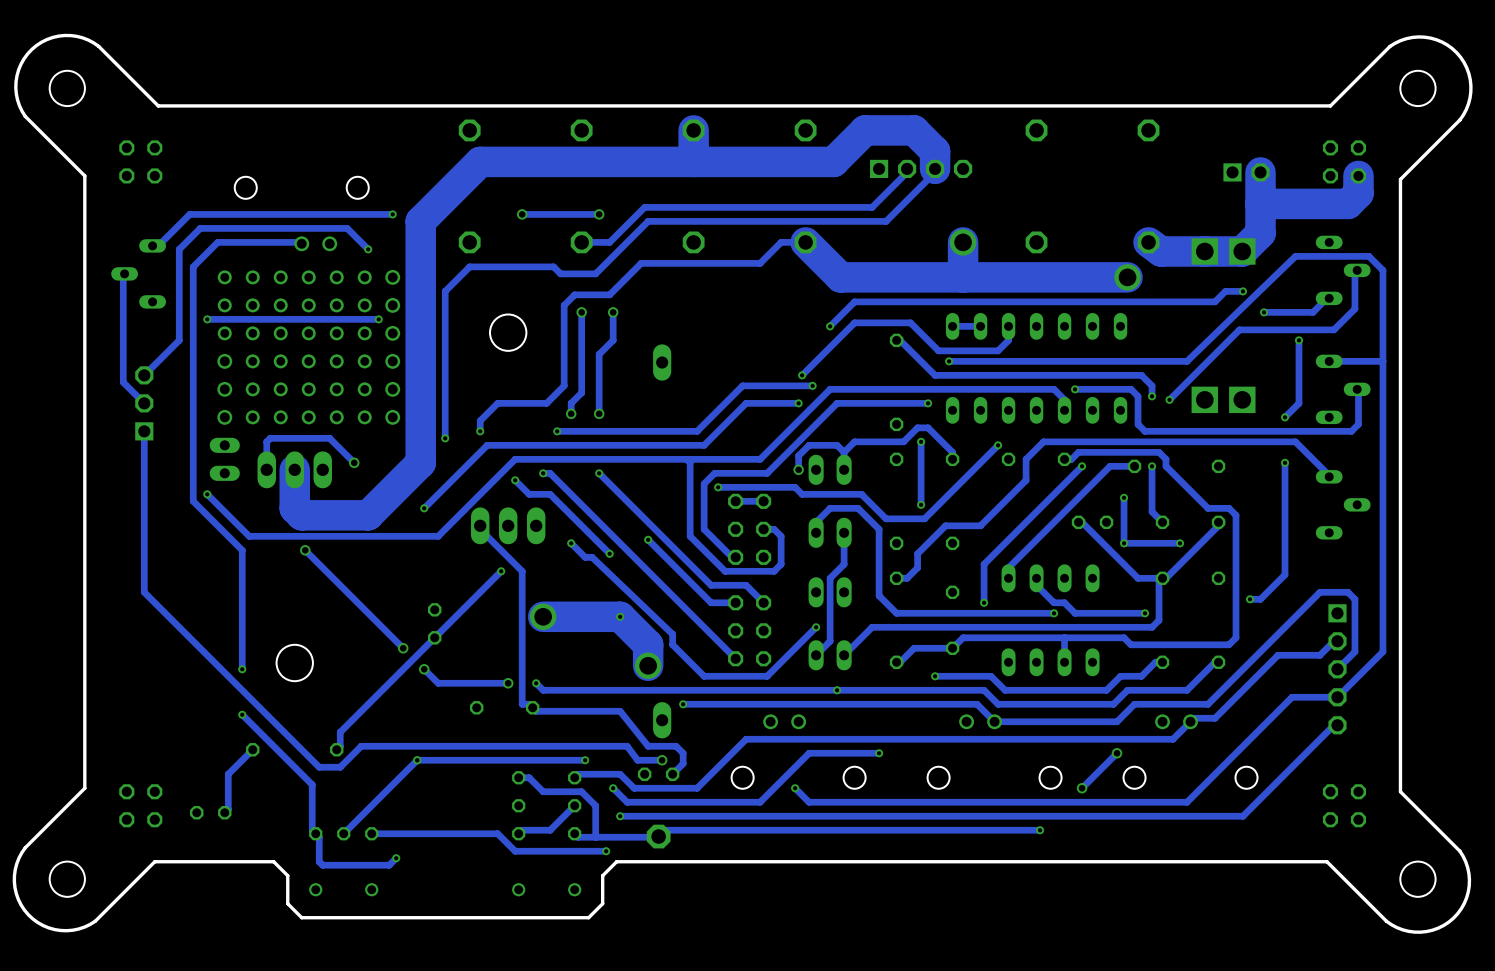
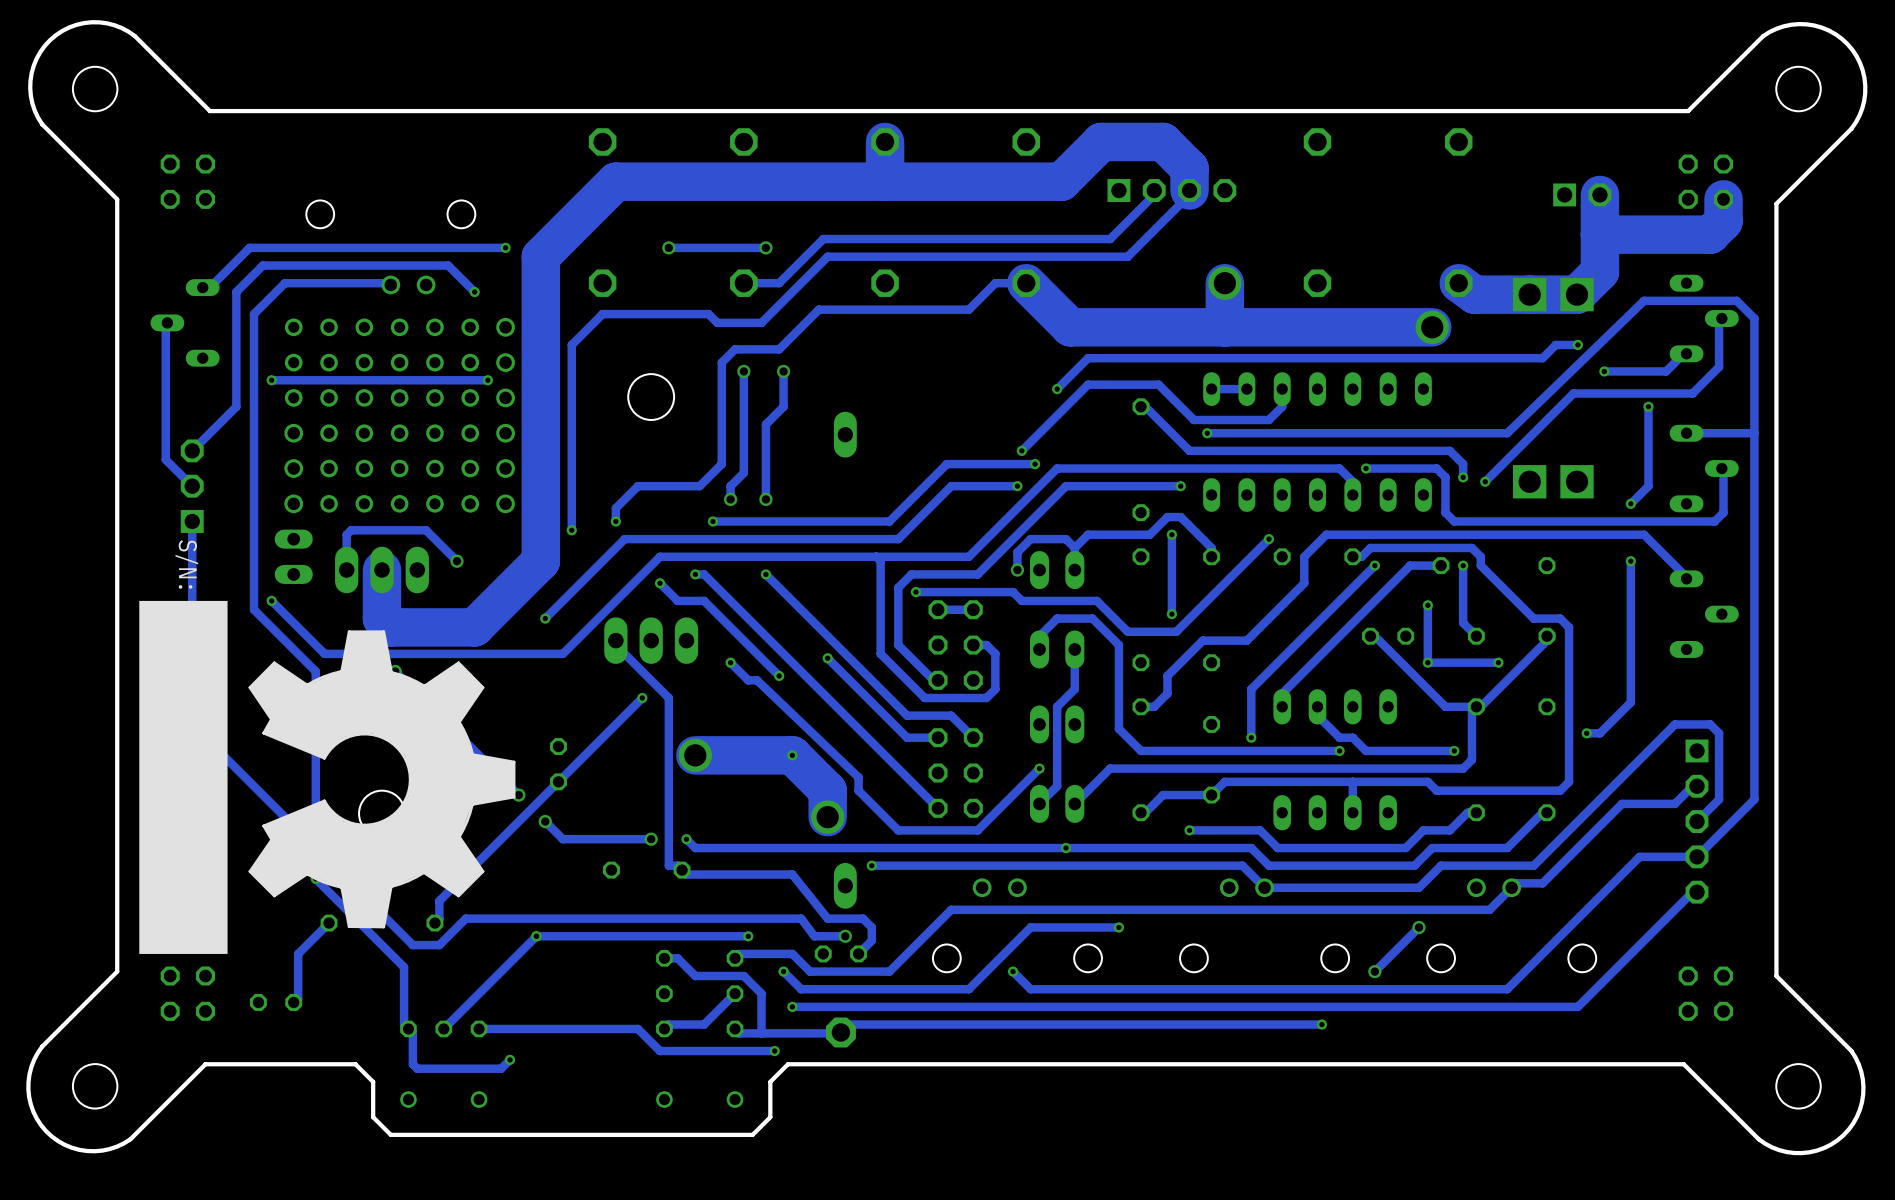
text: none -> S/N: (186, 564)
drawing: none -> [139, 600, 228, 954]
drawing: none -> [248, 630, 516, 929]

